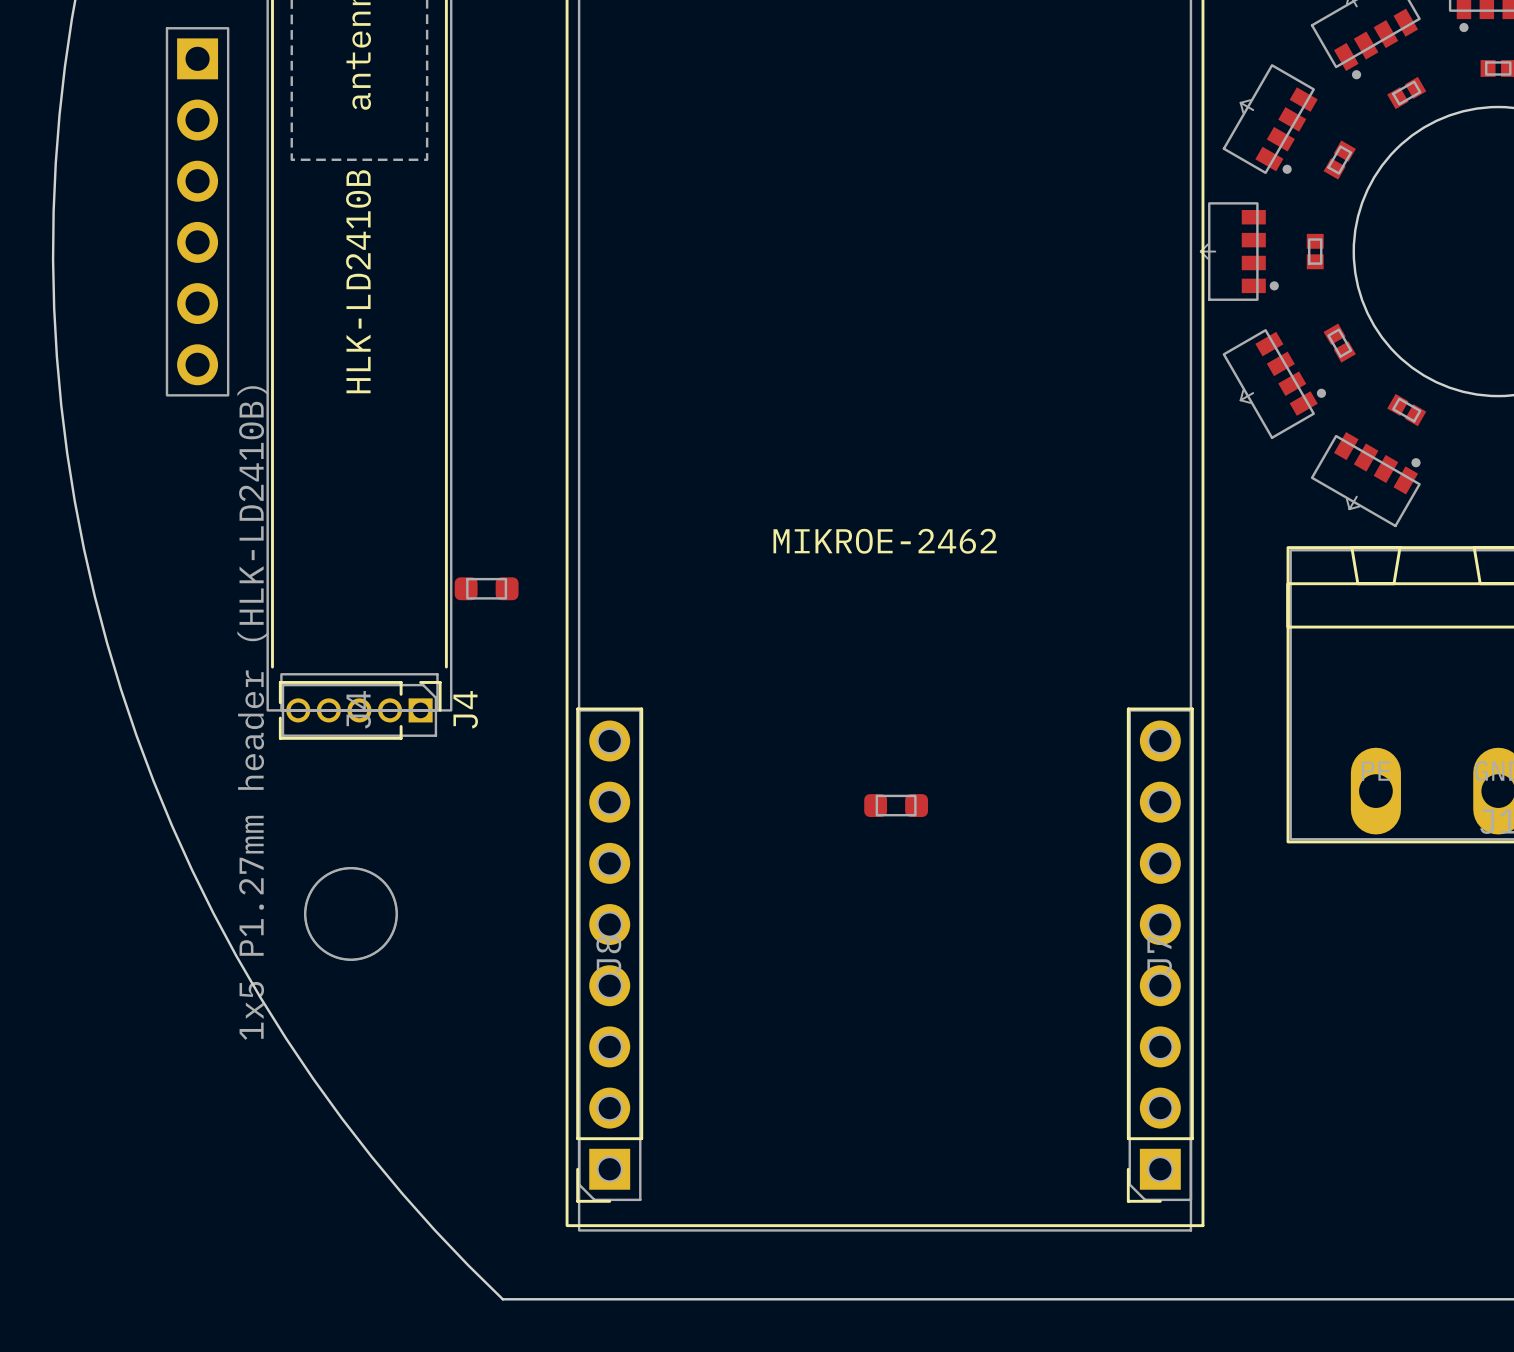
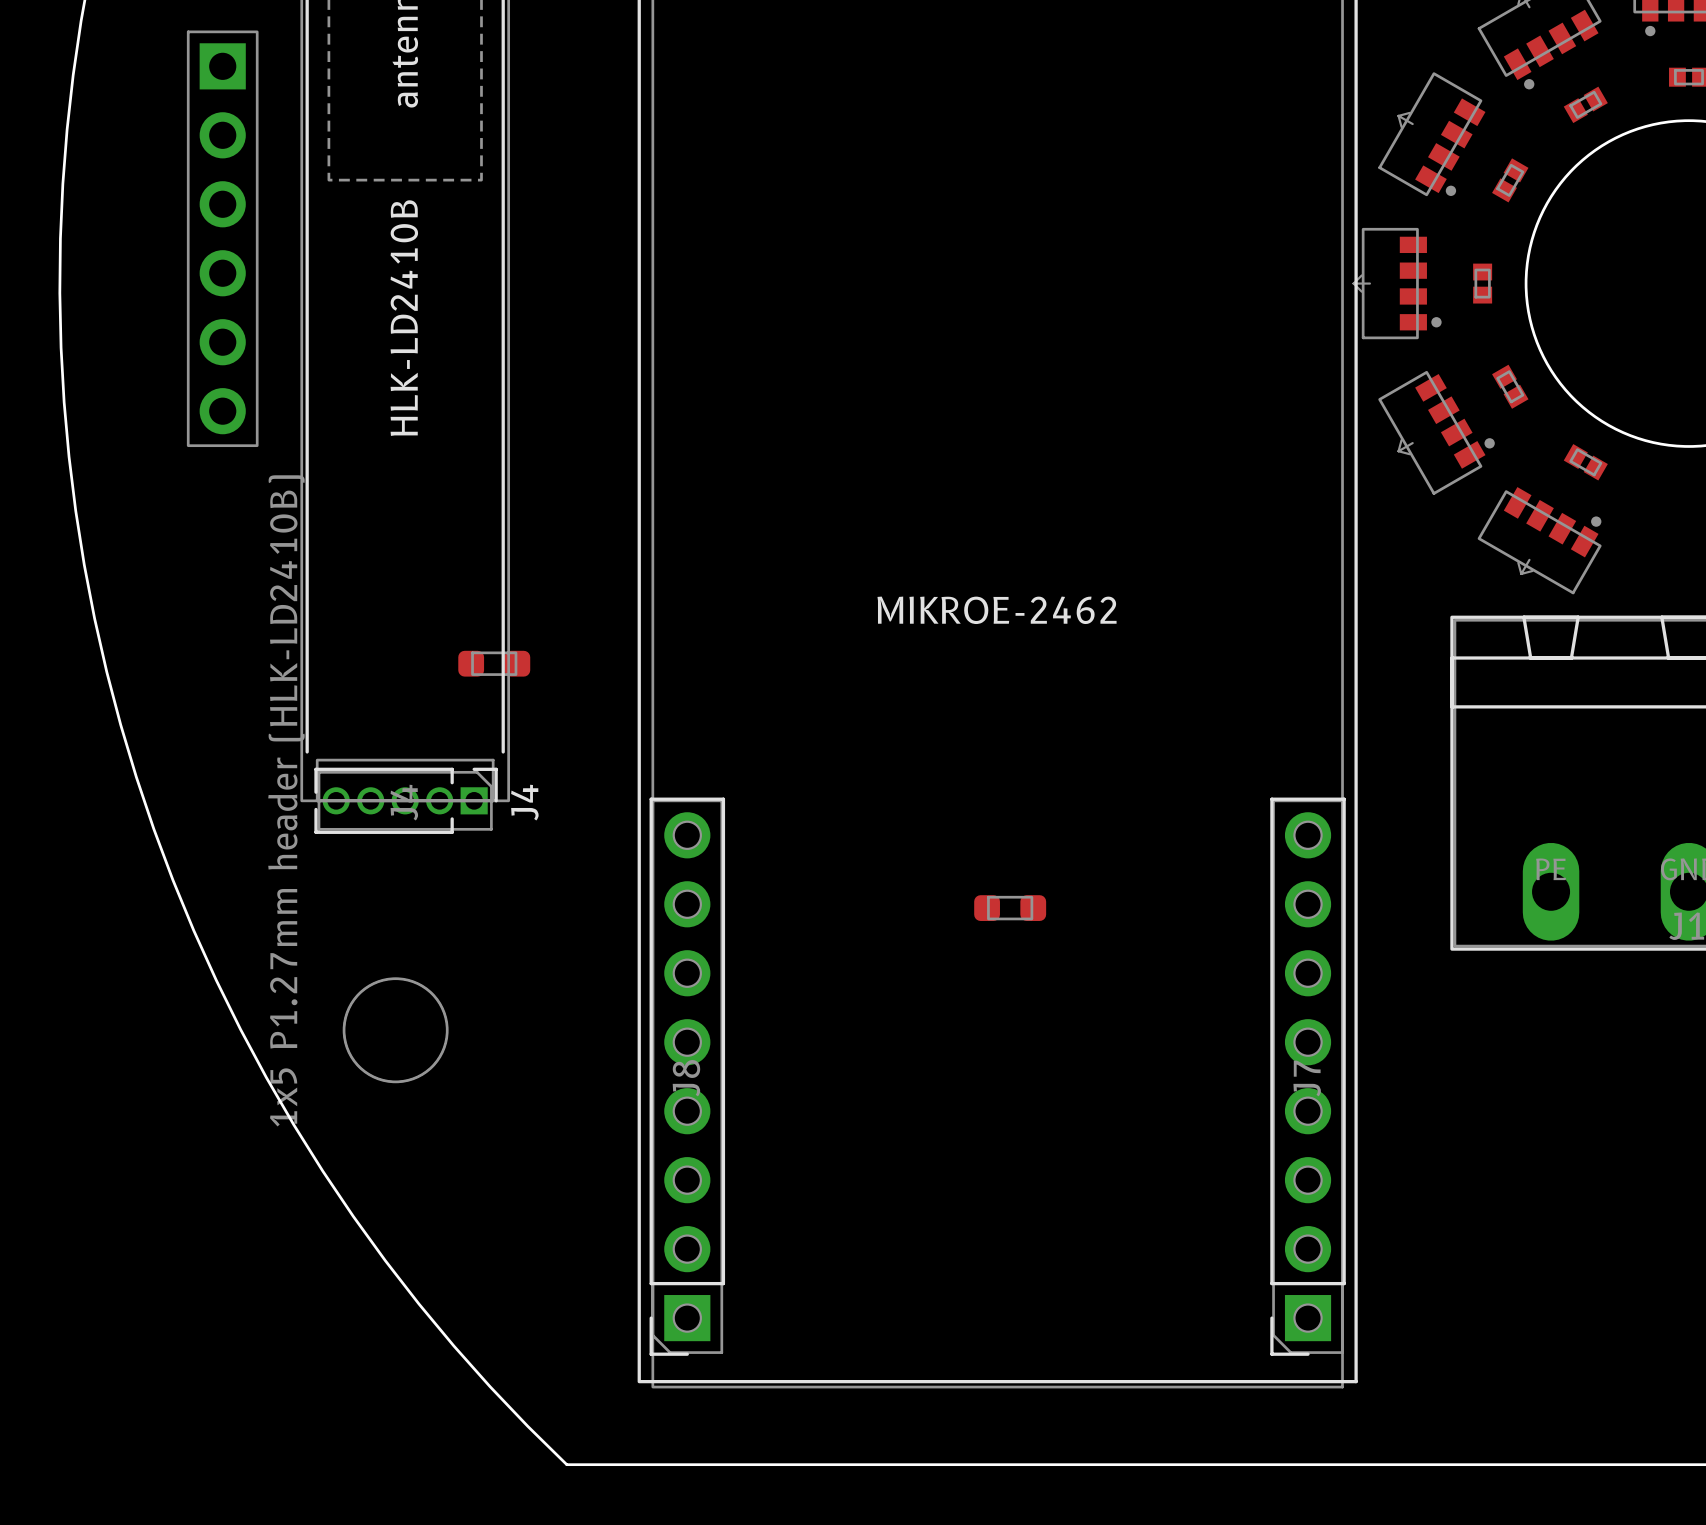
part position: (486, 588) -> (494, 663)

